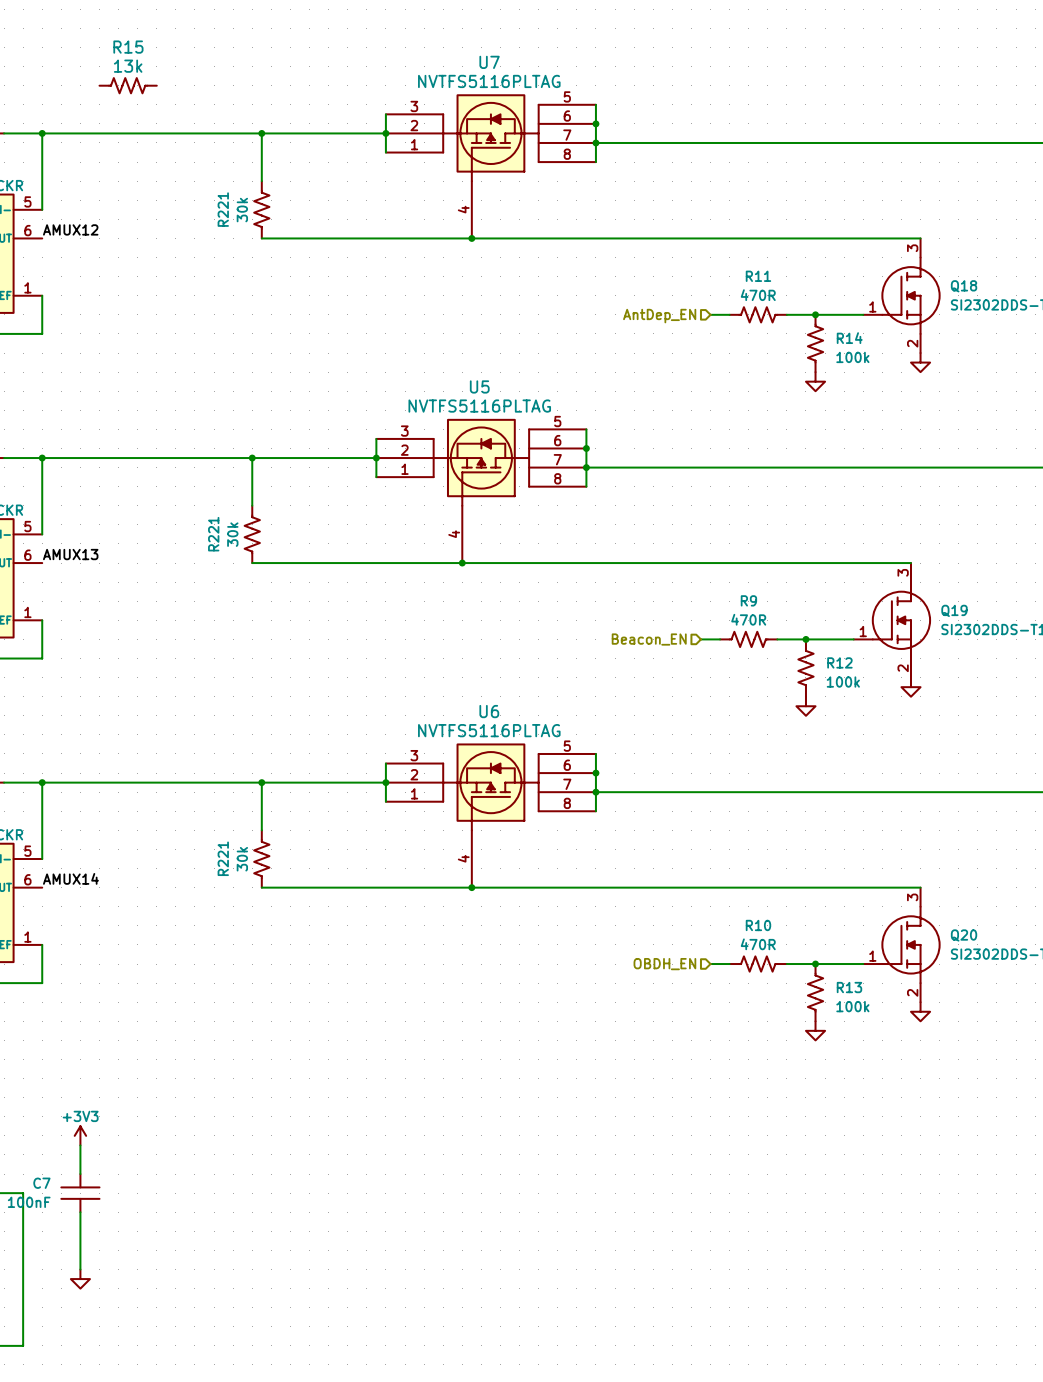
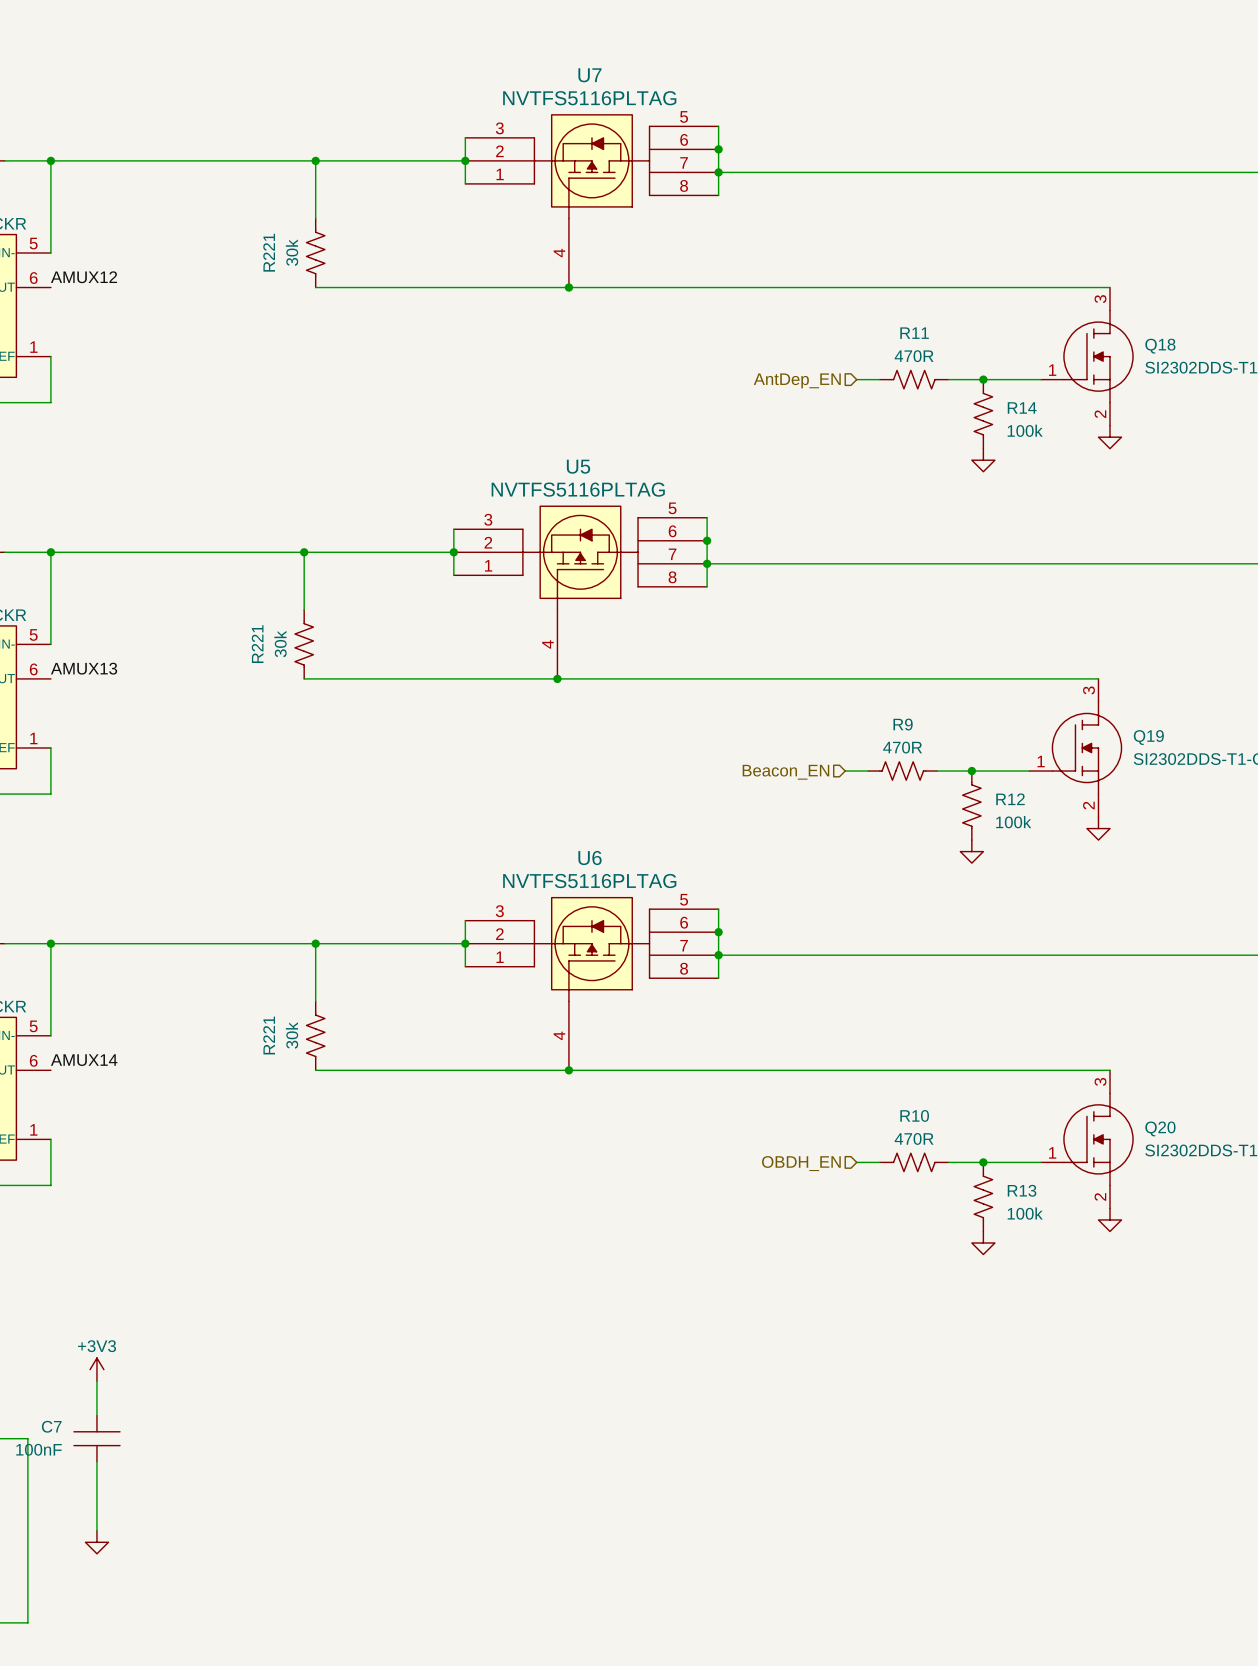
R15: 13k (128, 85) -> none

